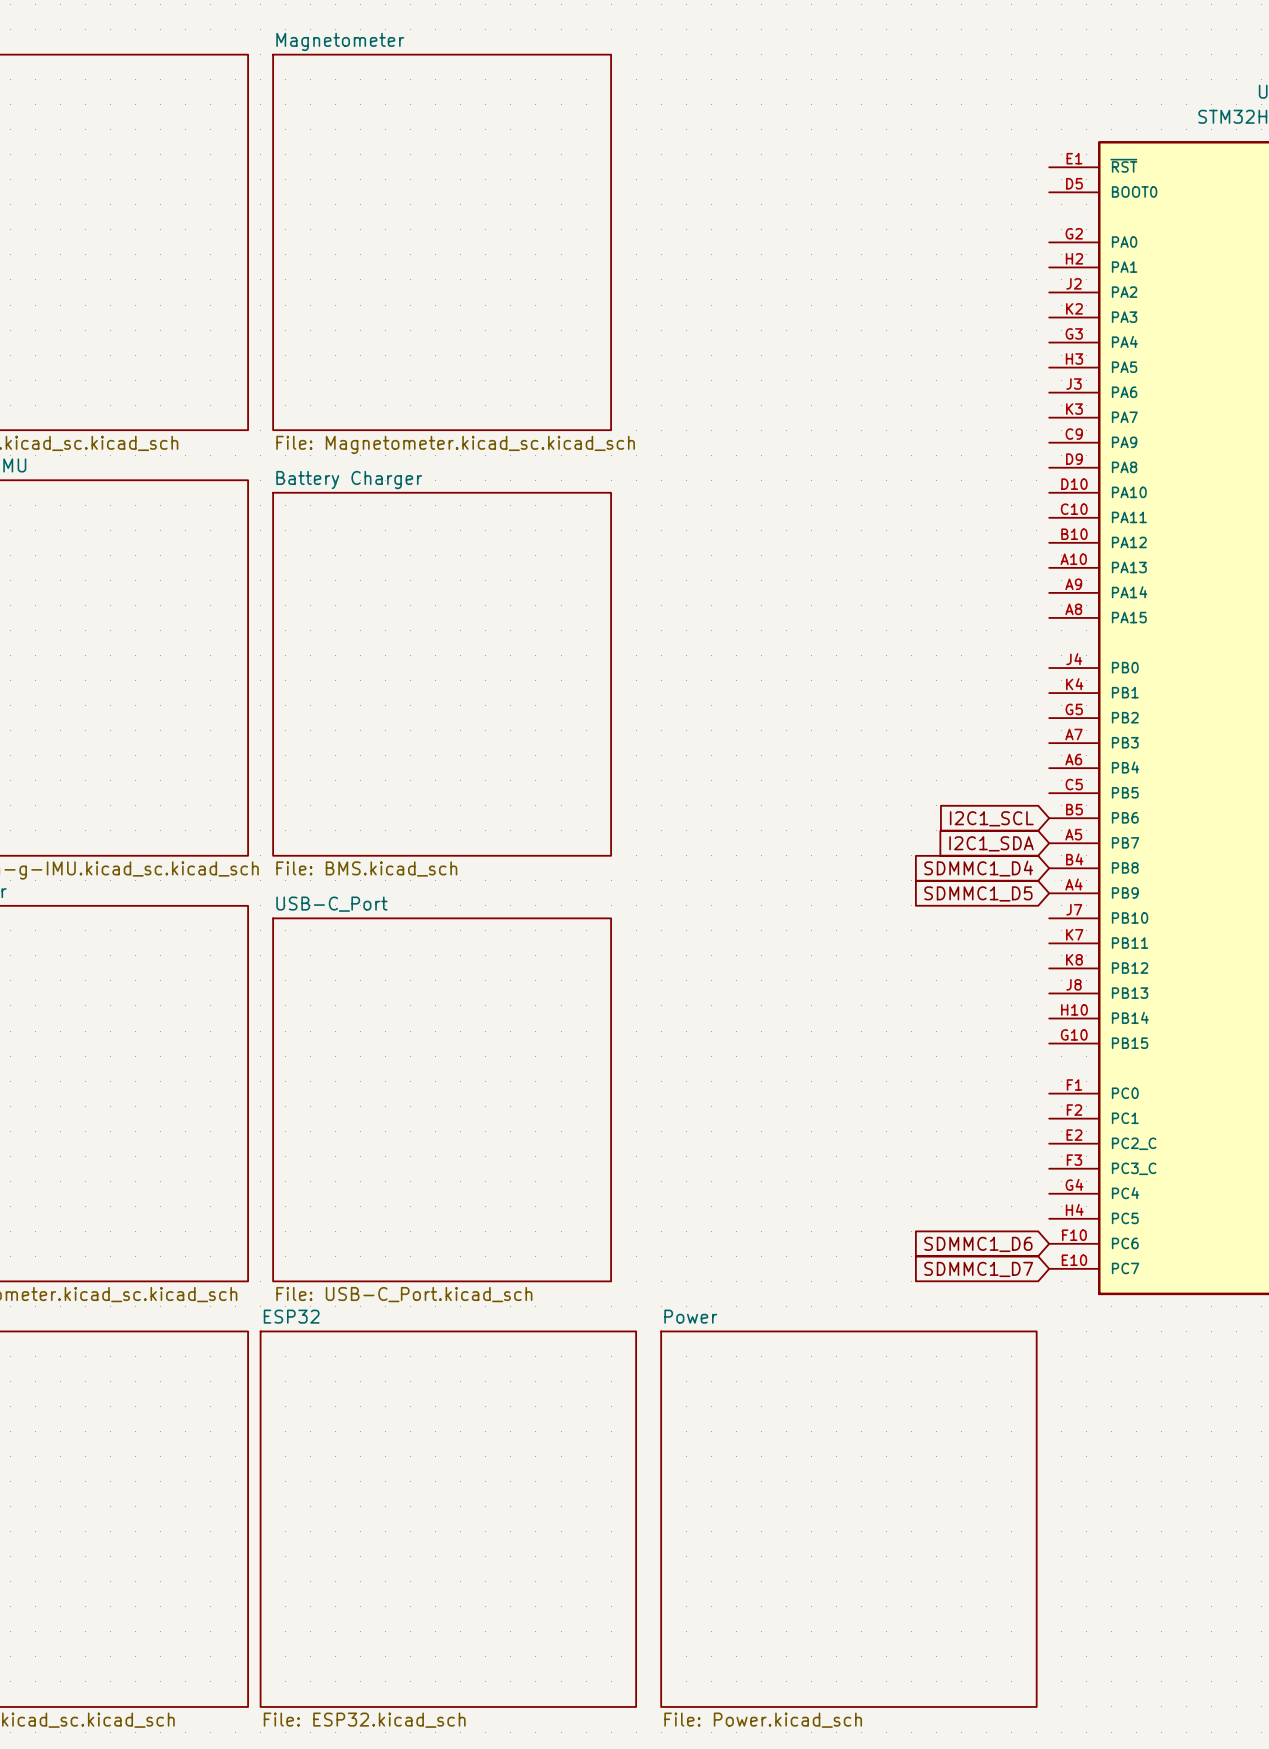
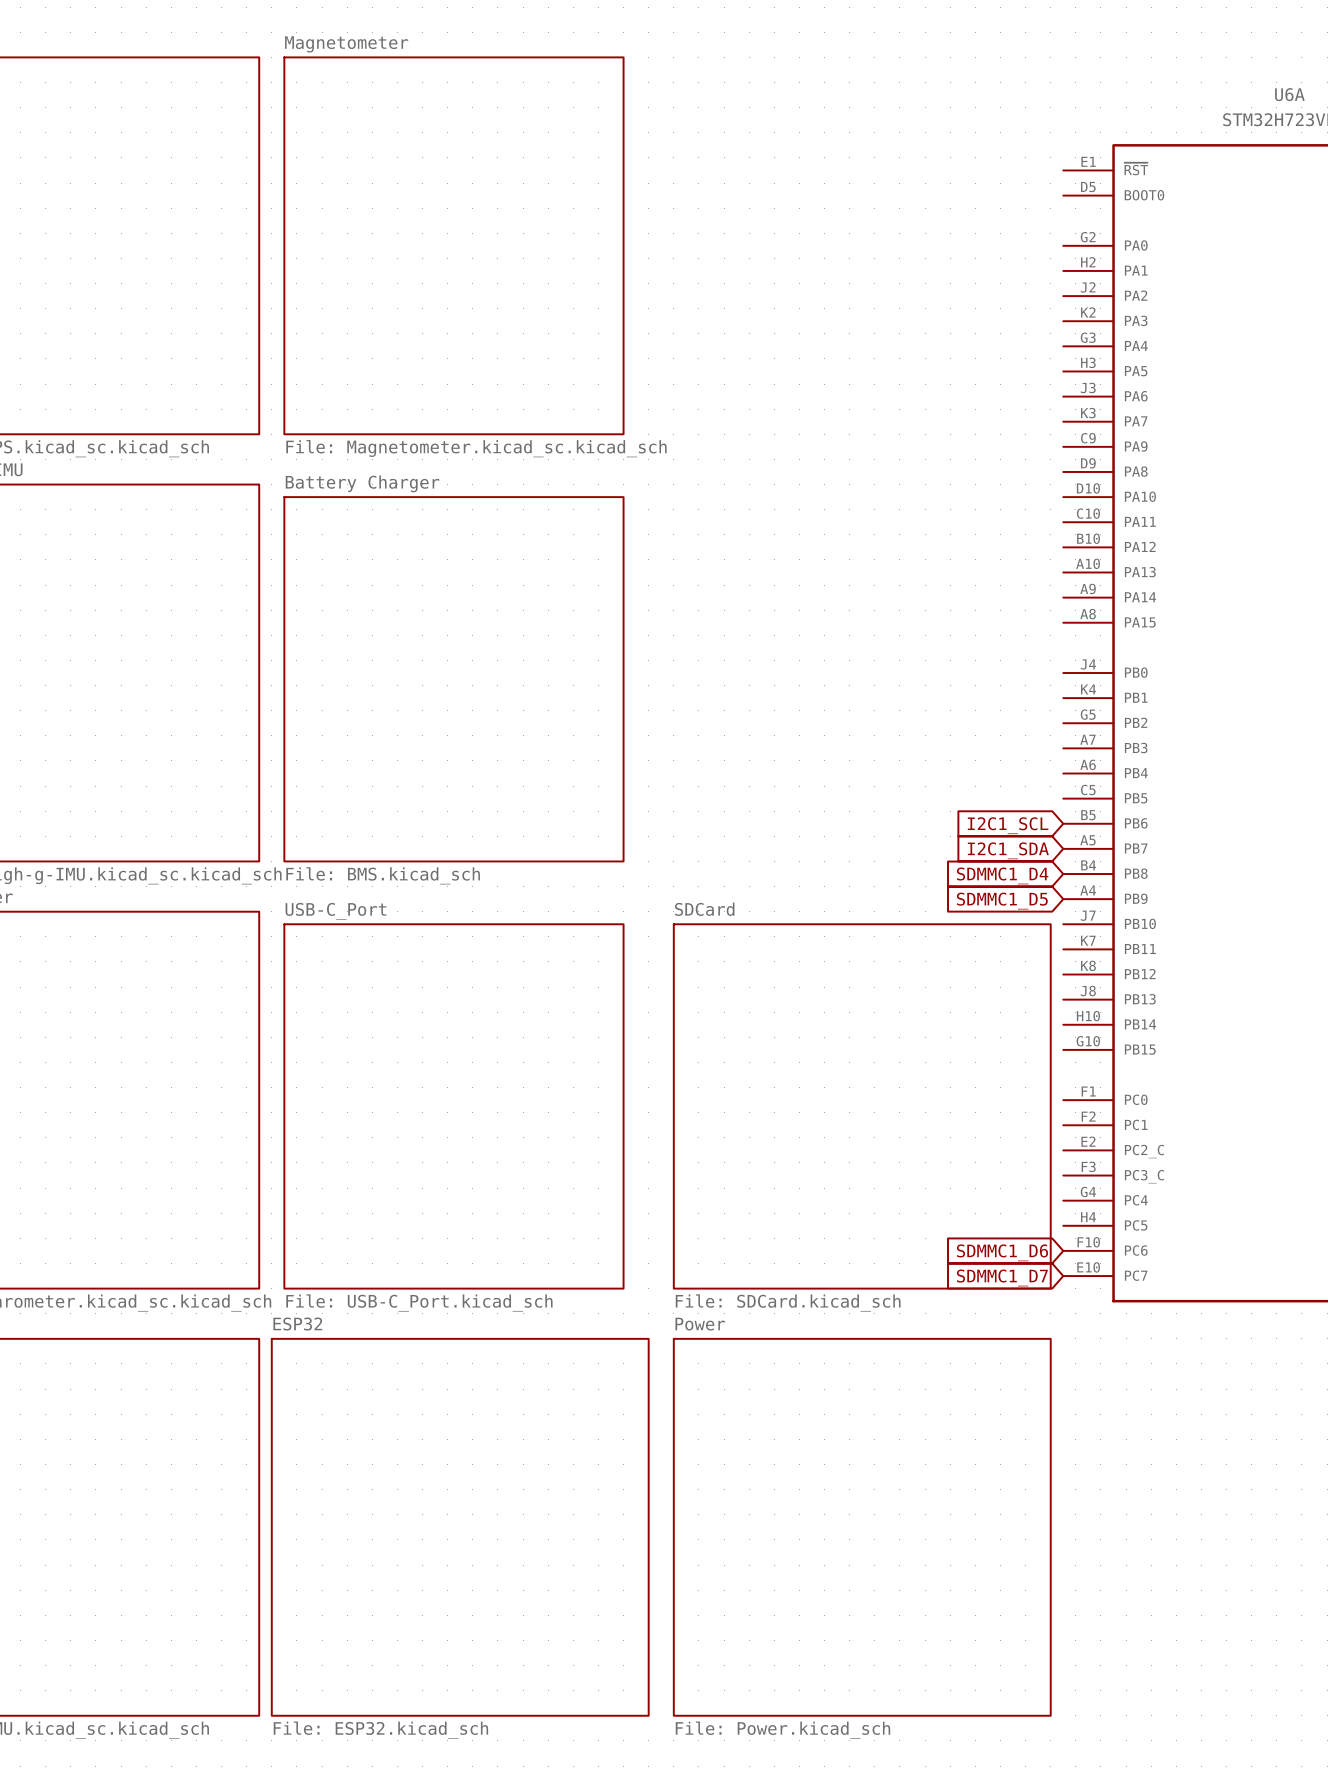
sheet SDCard: none -> File: SDCard.kicad_sch (862, 1106)

